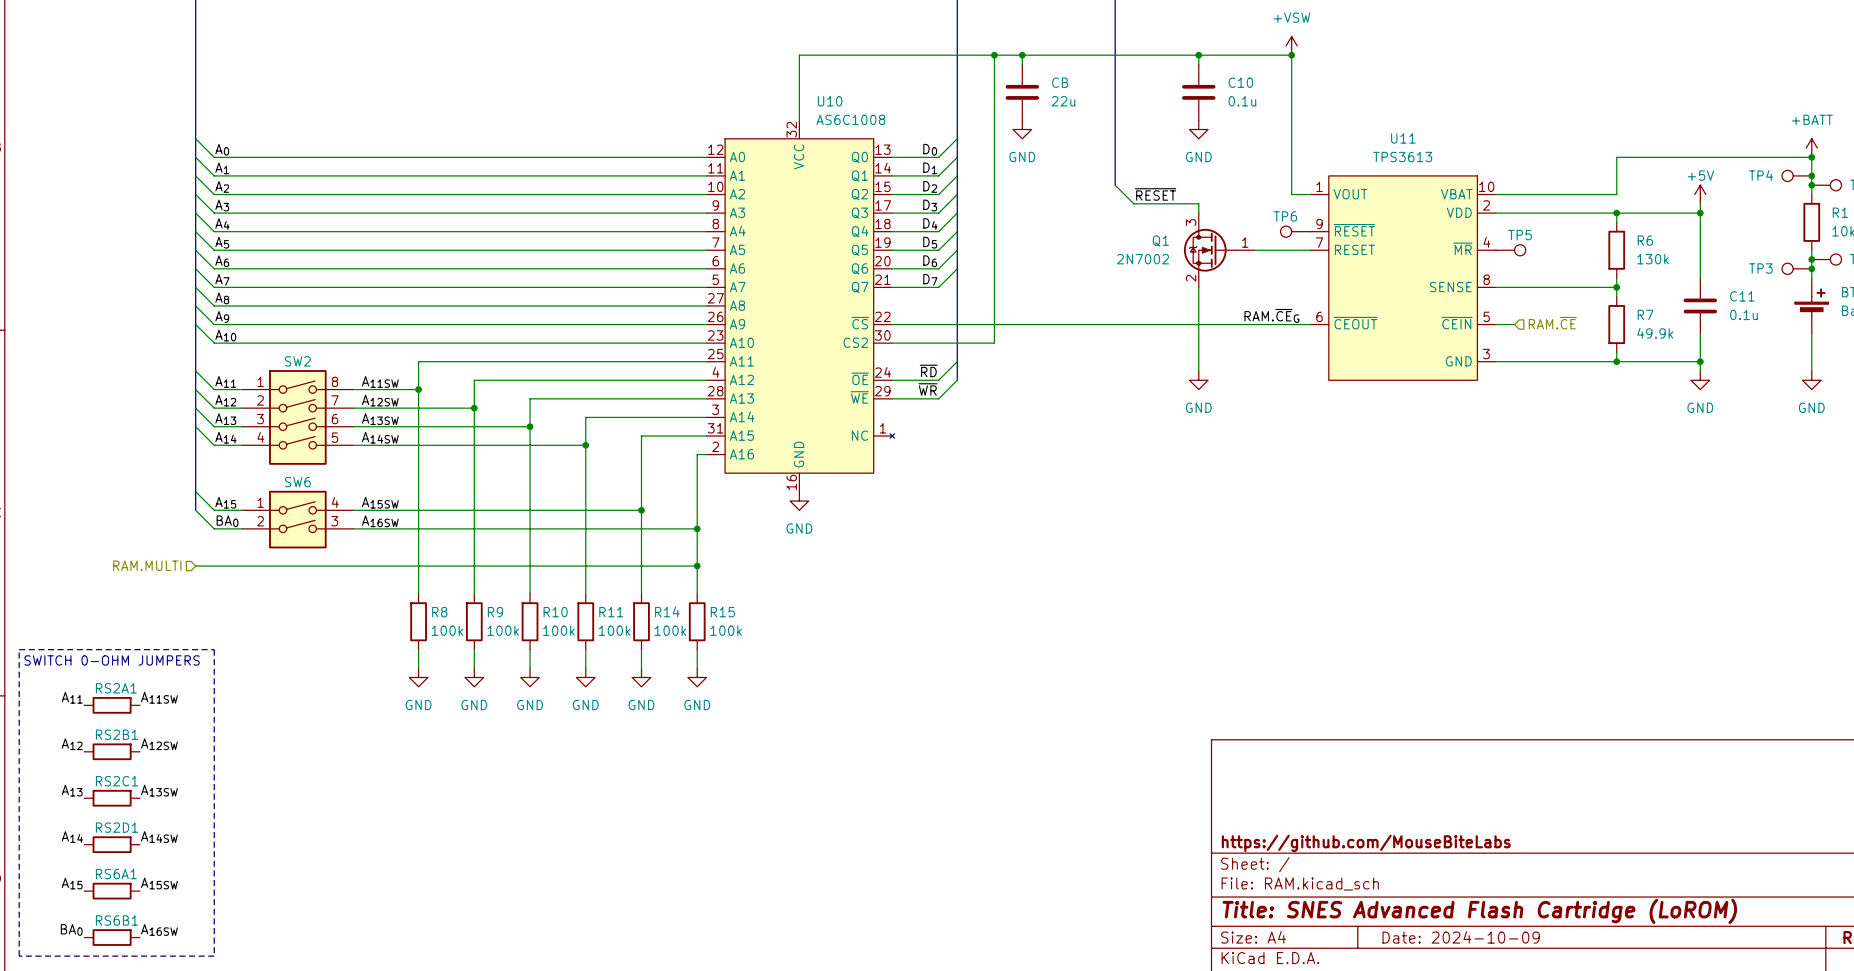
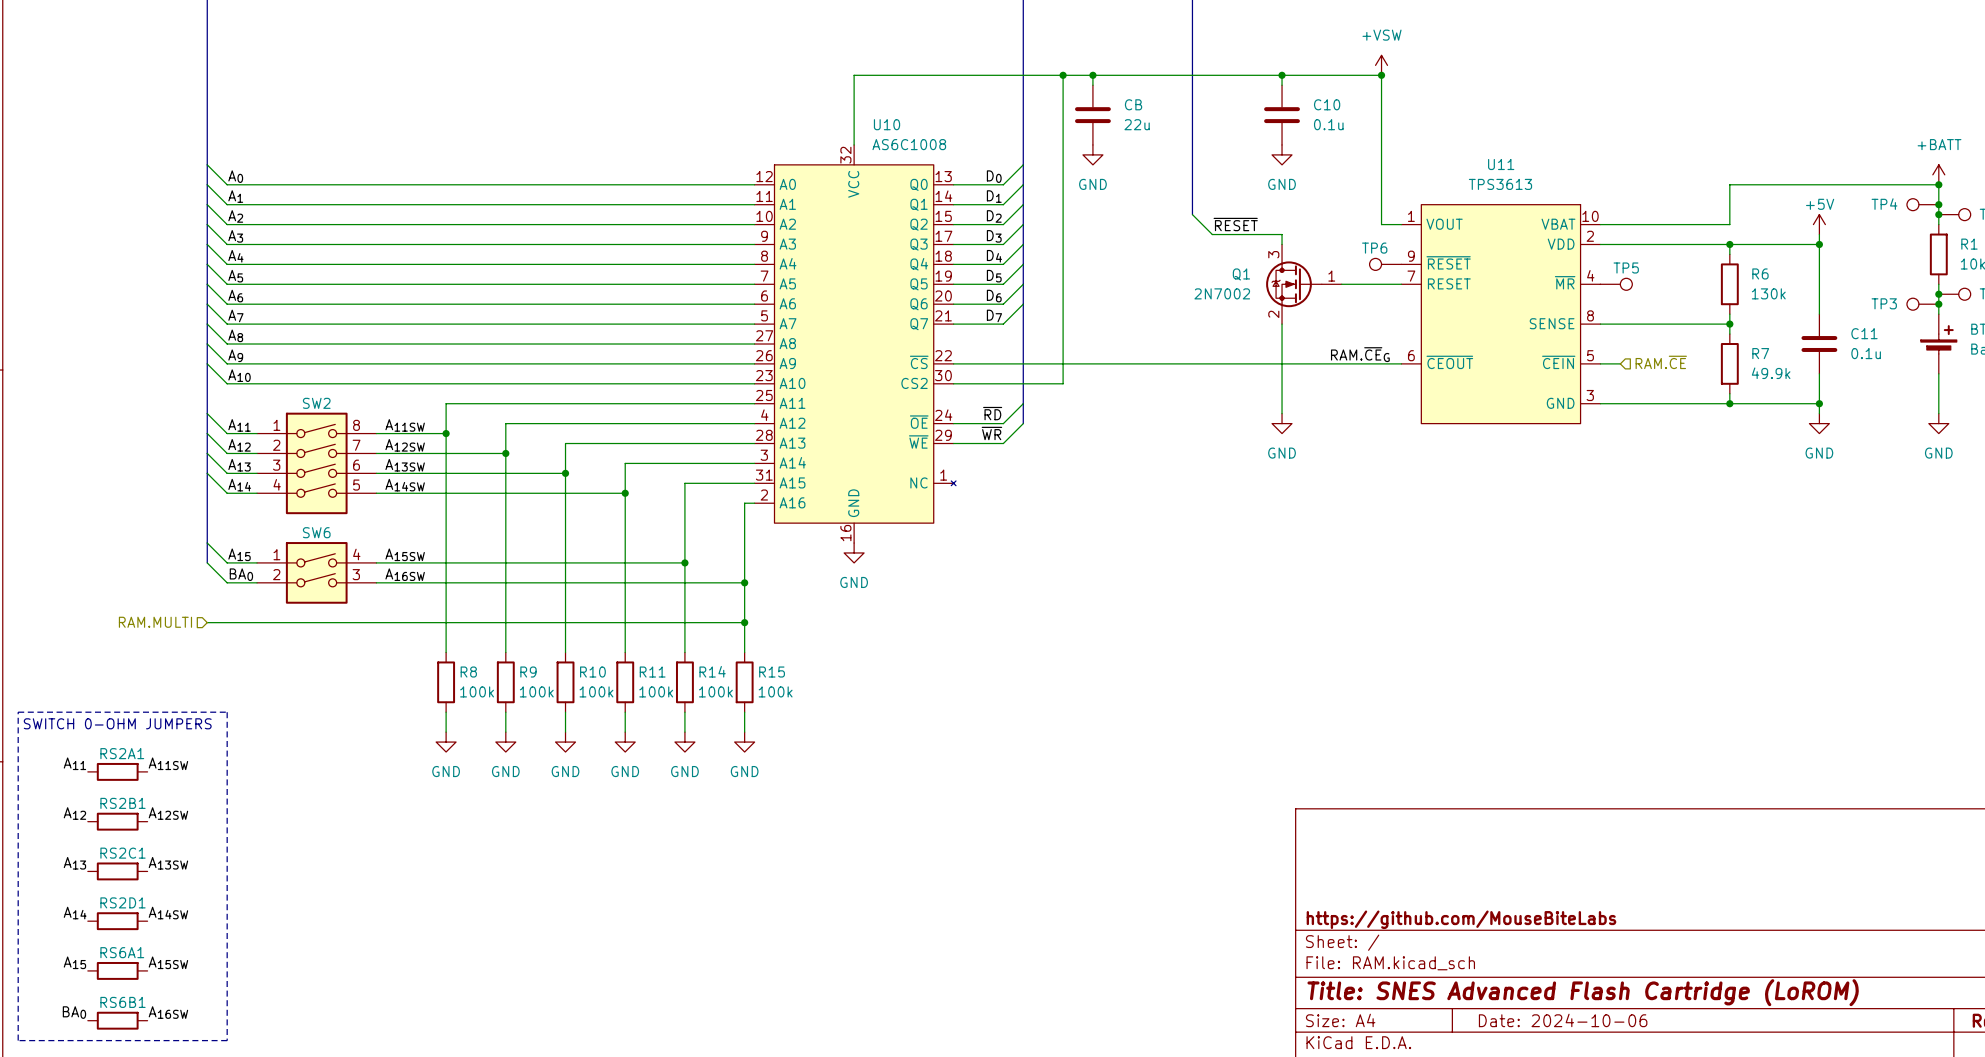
title block: Date: 2024-10-09 (1461, 937) -> Date: 2024-10-06 (1563, 1020)

